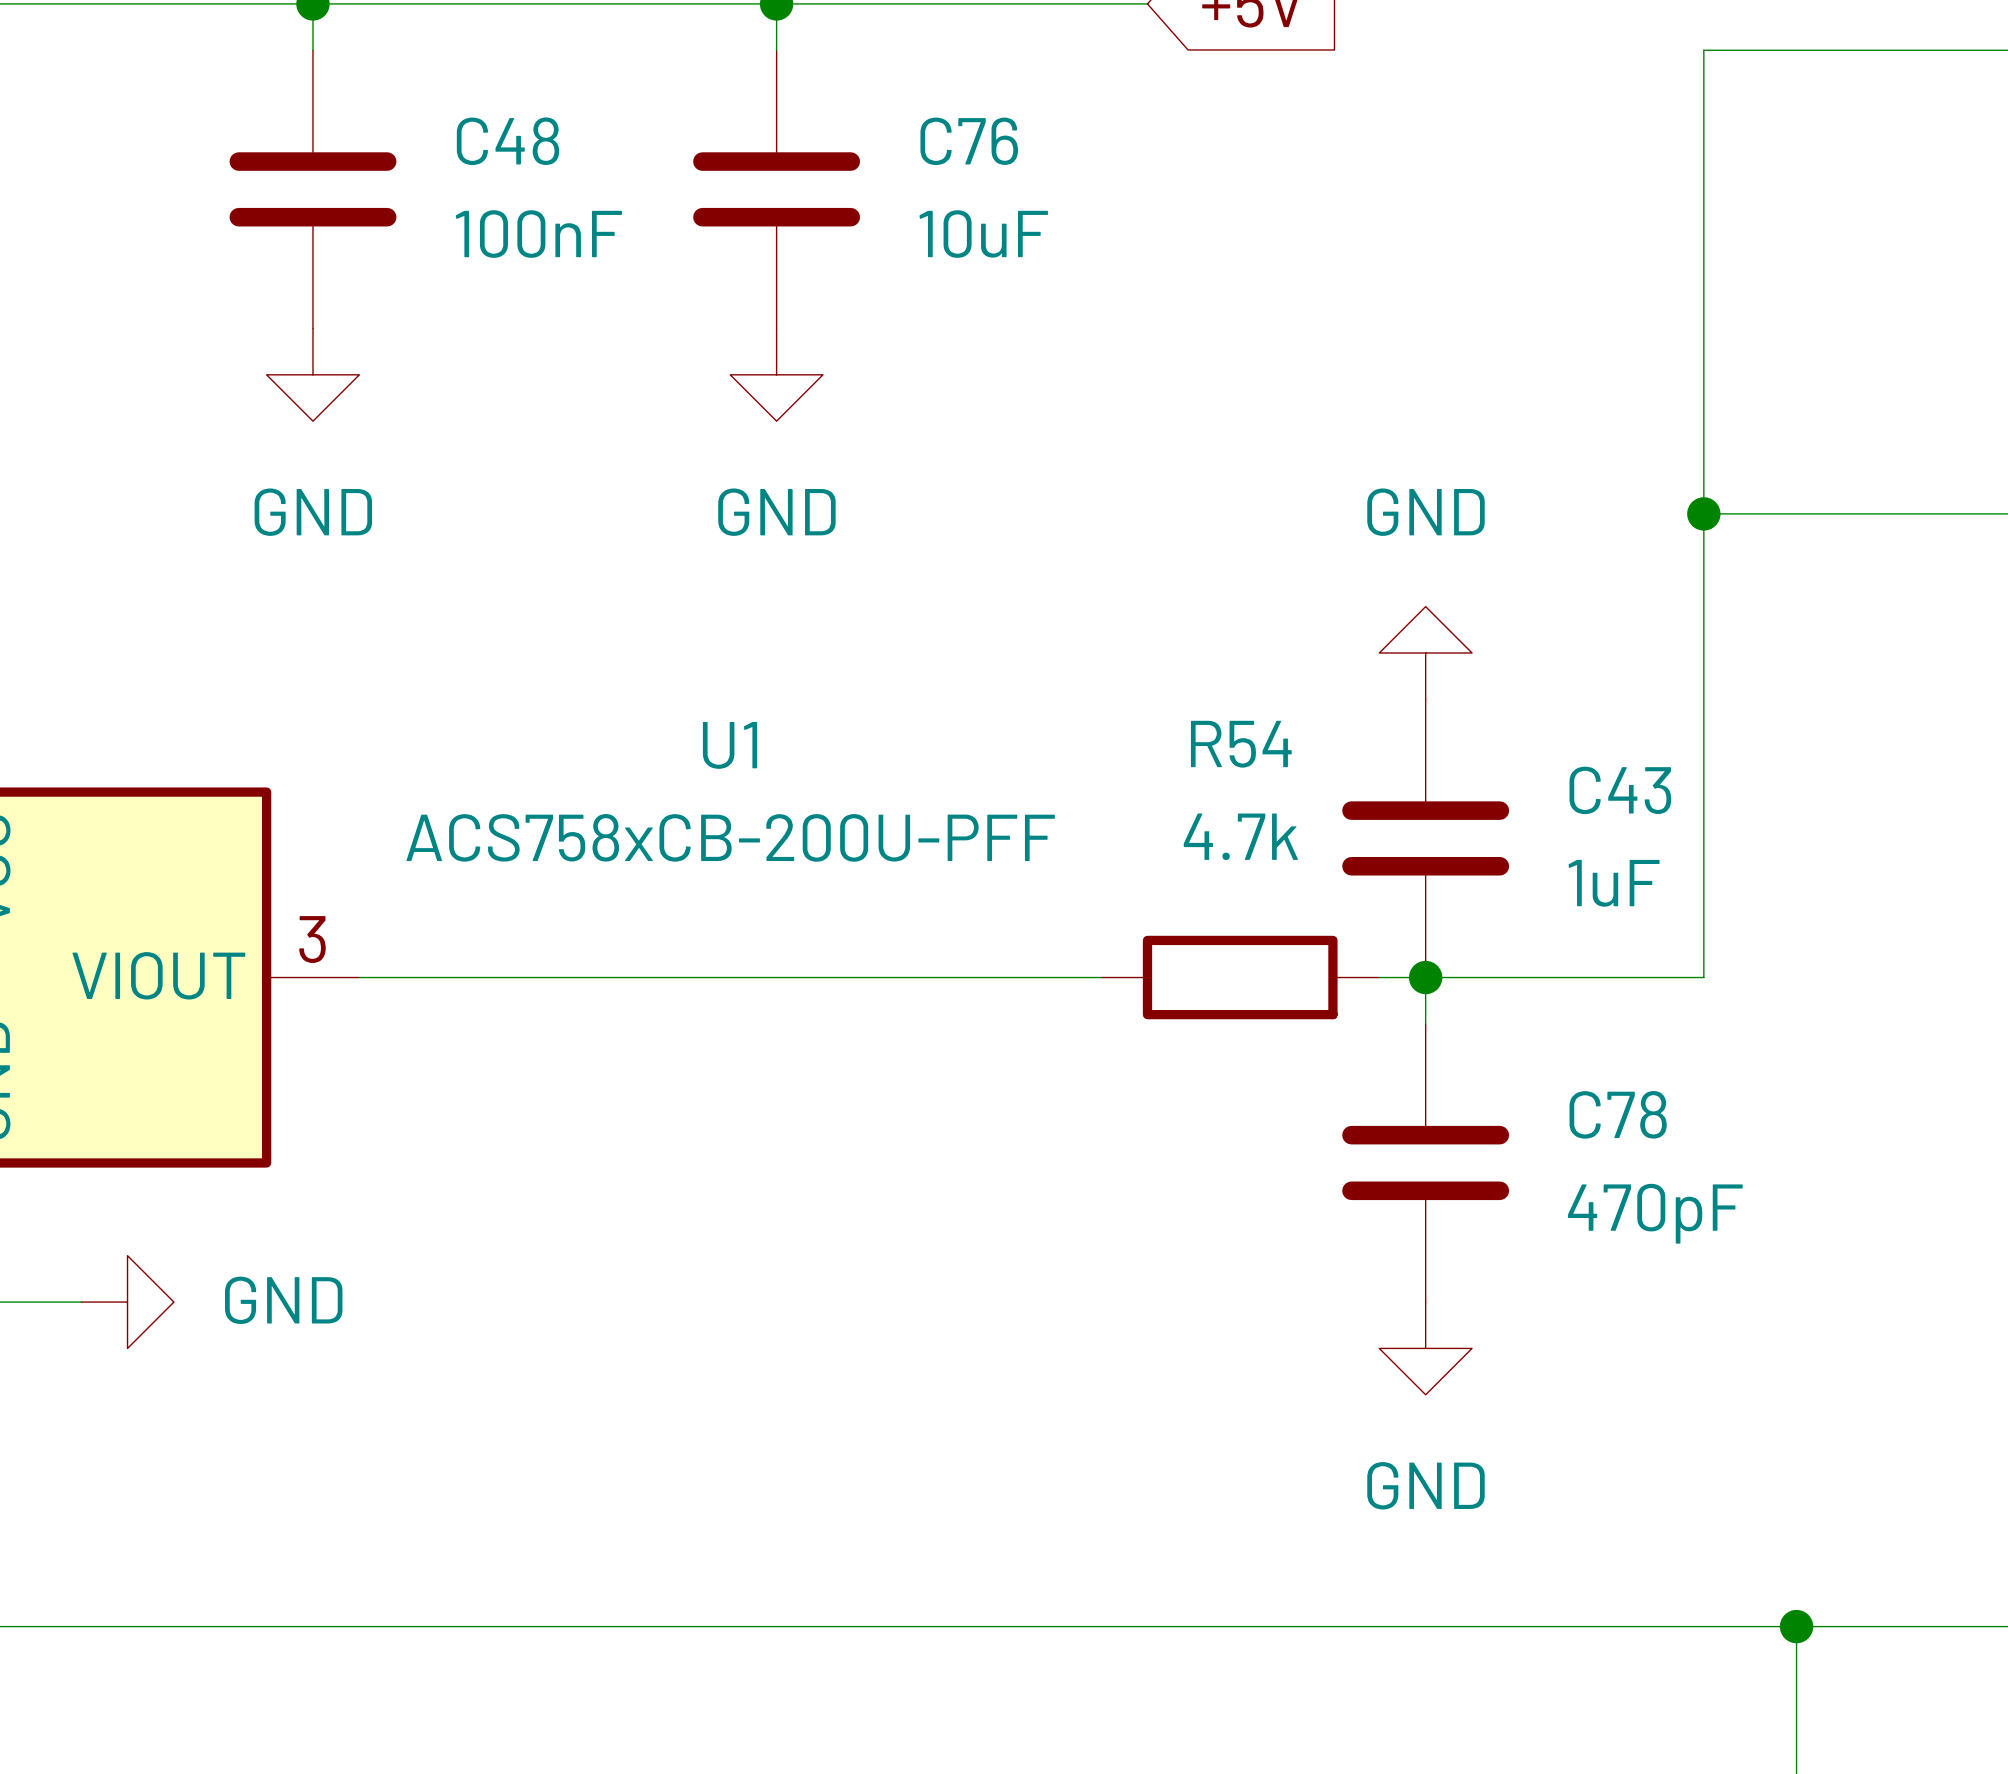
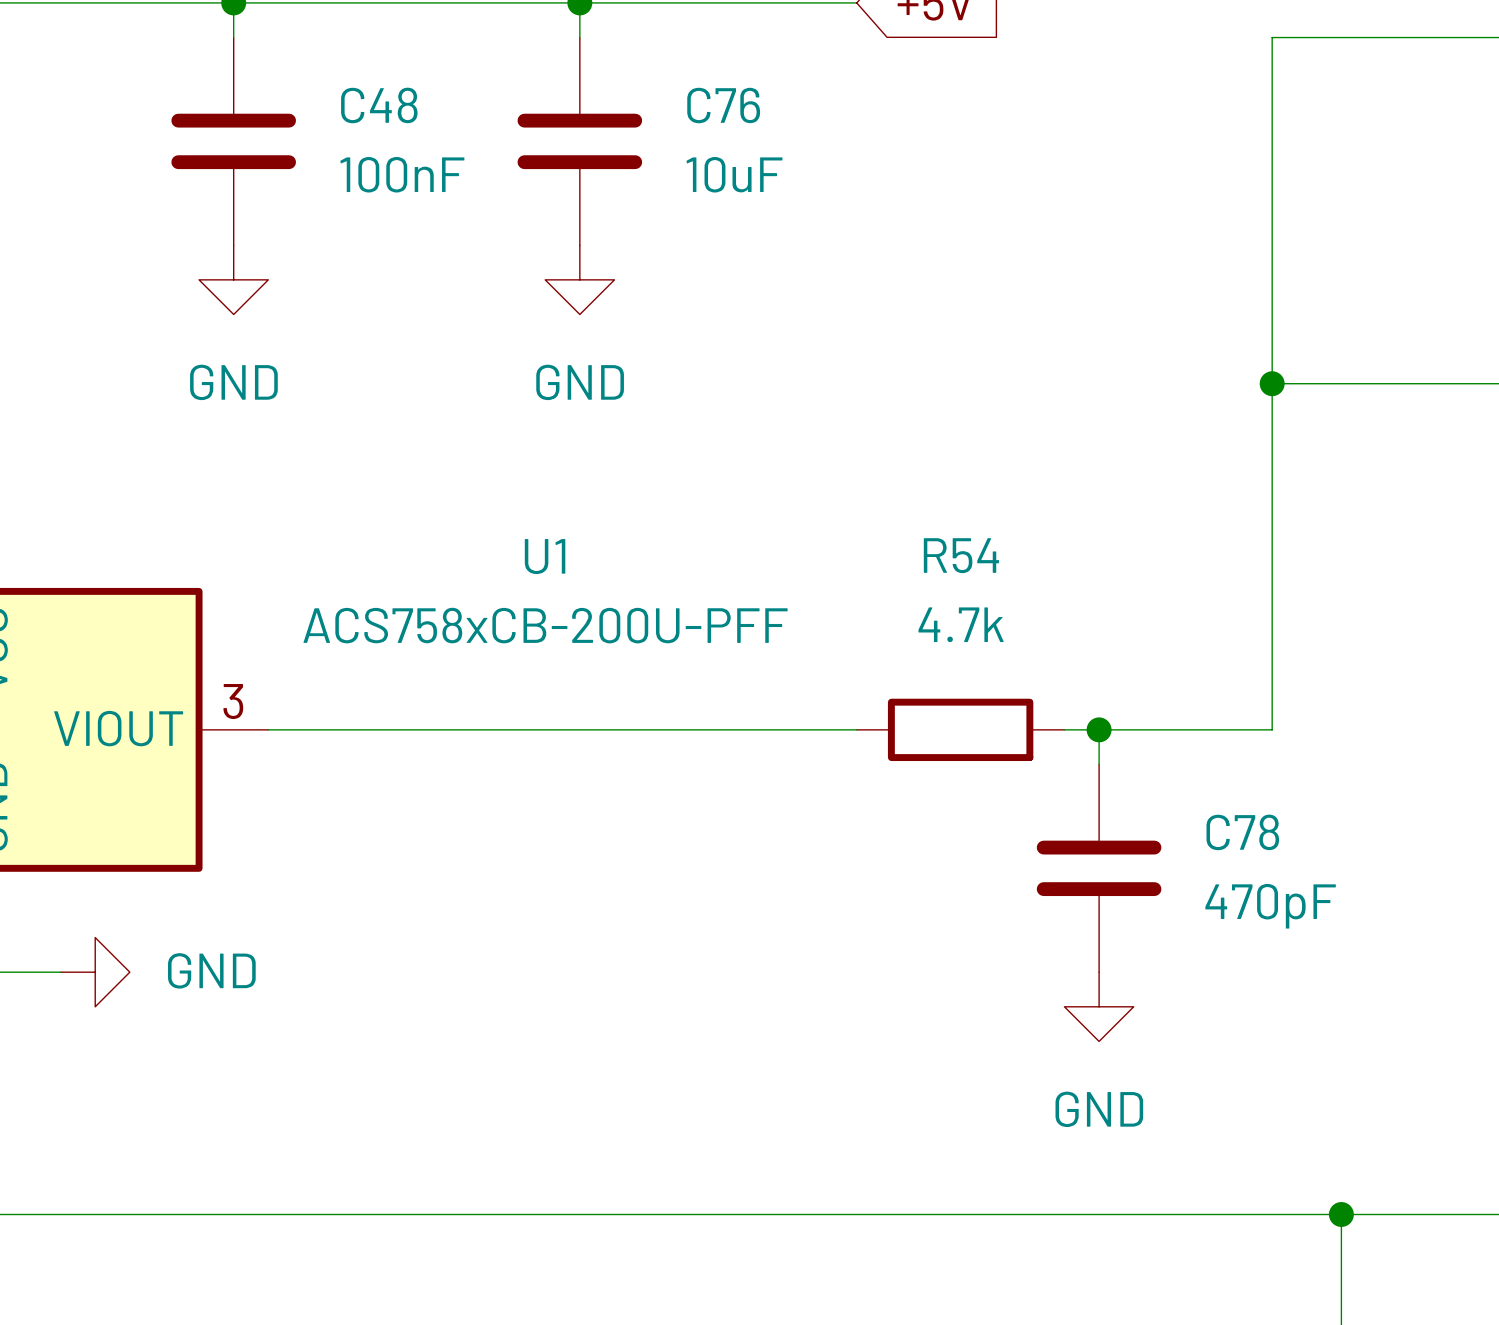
power symbol: GND (1425, 652) -> none
C43: 1uF (1425, 838) -> none
R54 position: (1240, 977) -> (960, 729)
wire: (1379, 977) (1425, 977) (1425, 1023) -> none
junction position: (1425, 977) -> (1099, 729)
wire: none -> (1099, 729) (1099, 764)
C78 position: (1425, 1162) -> (1099, 868)
power symbol position: GND (1425, 1348) -> GND (1099, 1006)

